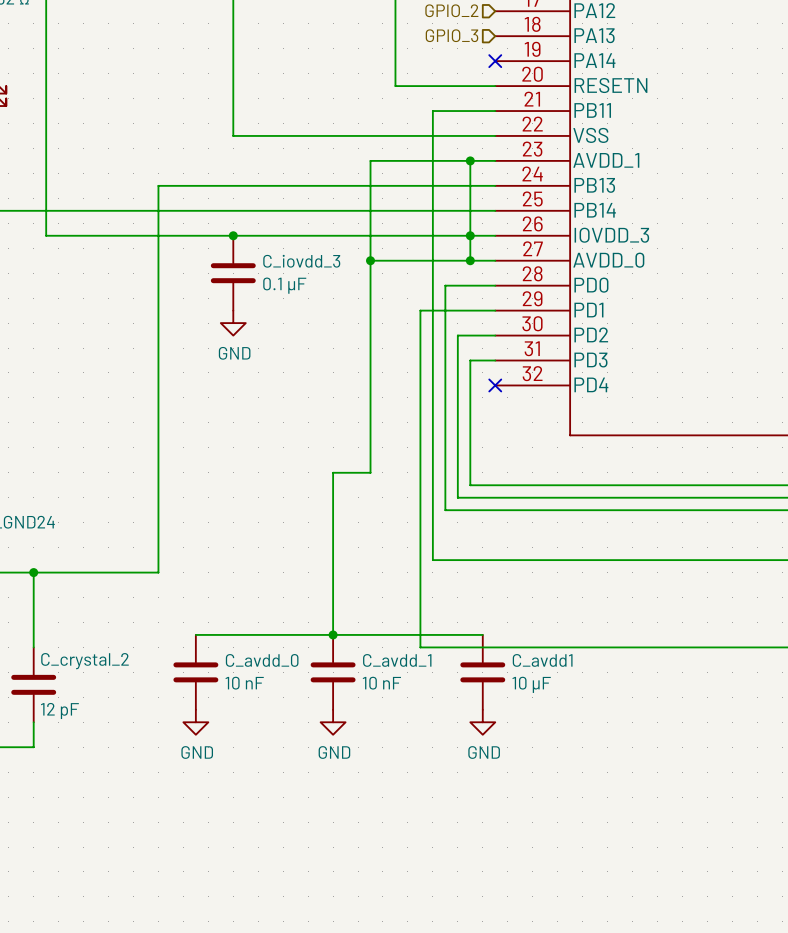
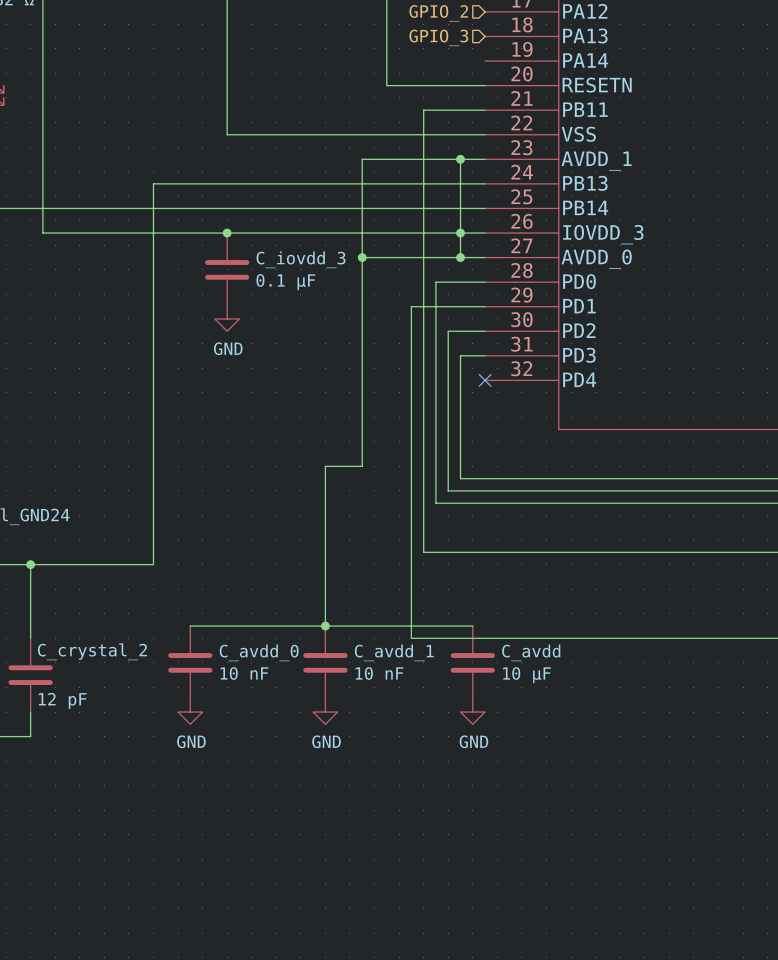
no-connect mark: (495, 61) -> none
C_avdd1 name: C_avdd1 (542, 660) -> C_avdd (531, 652)

